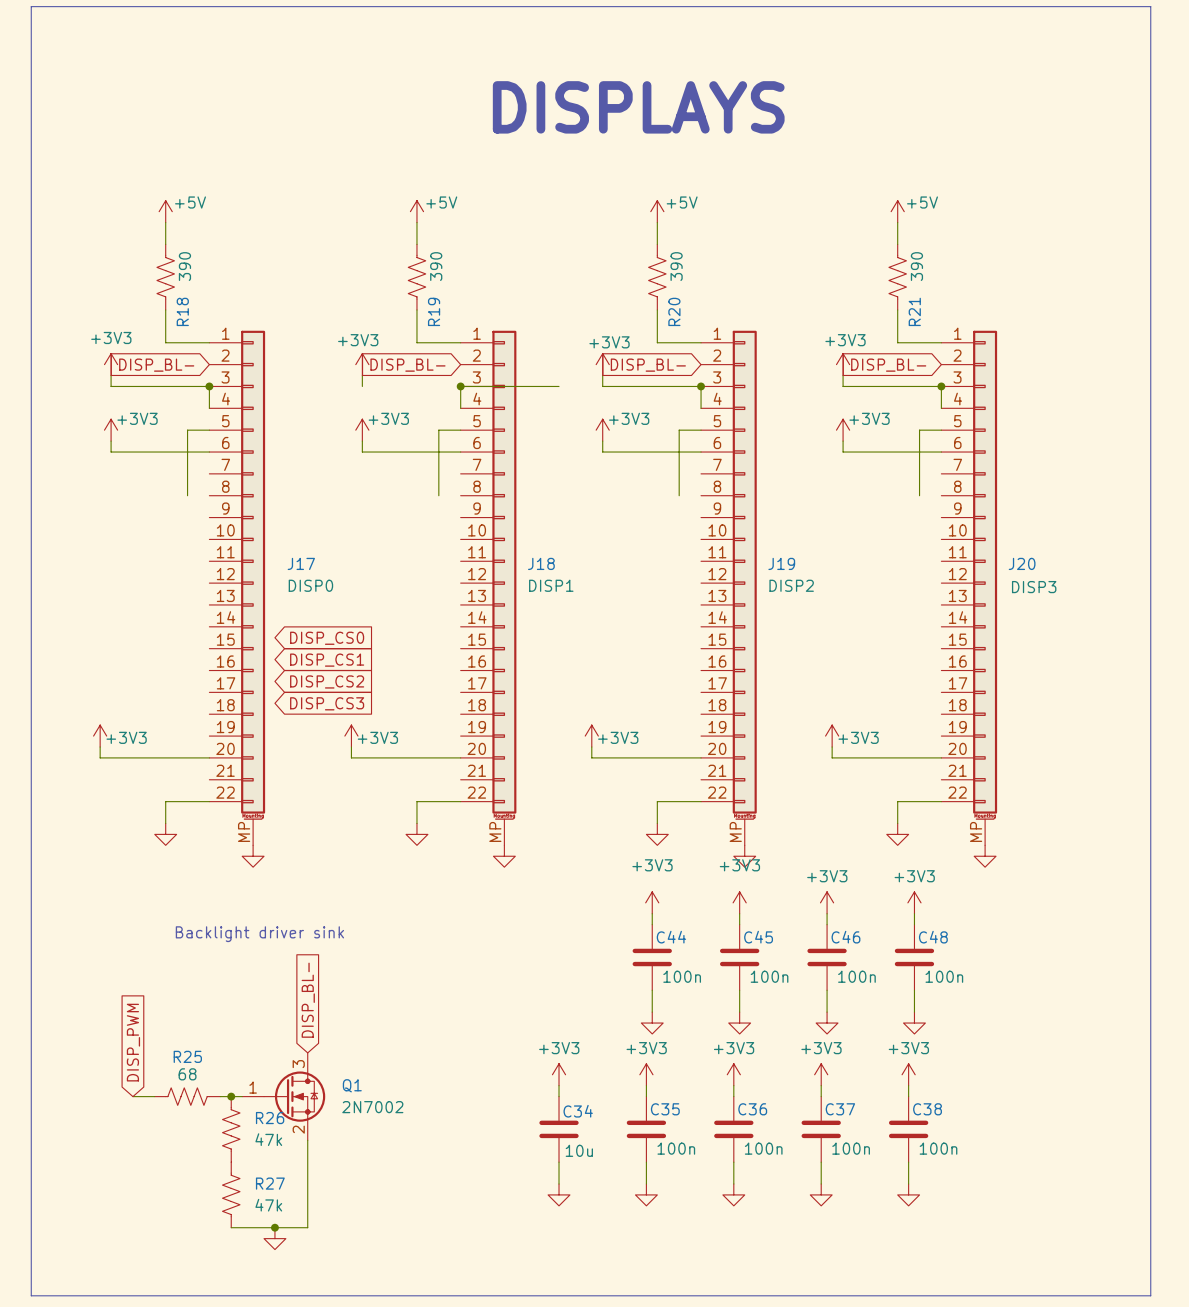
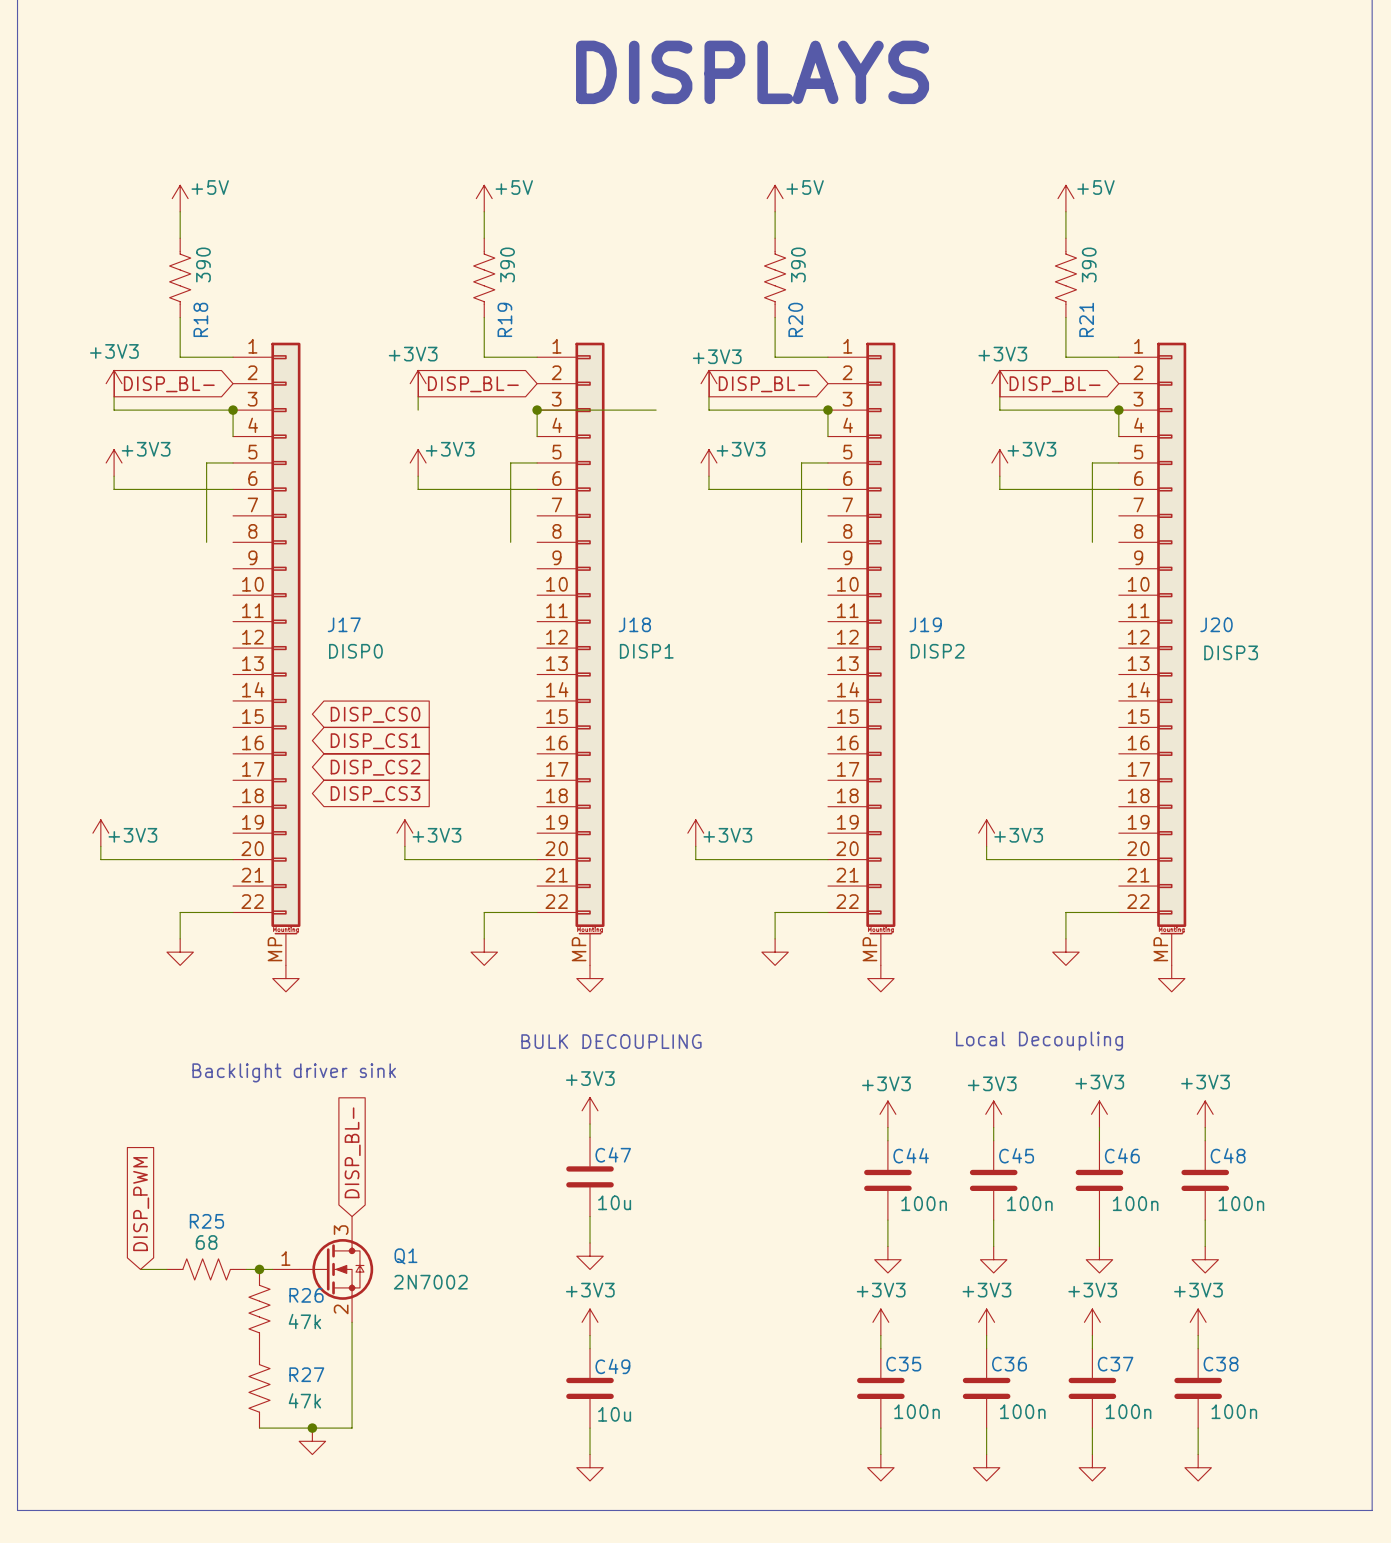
power symbol: +3V3 (652, 902) -> none
power symbol: +3V3 (739, 902) -> none
power symbol: +3V3 (827, 902) -> none
power symbol: +3V3 (914, 902) -> none
text: none -> Local Decoupling (1039, 1041)
text: none -> BULK DECOUPLING (611, 1041)
wire: (652, 913) (652, 924) -> (887, 1127) (887, 1140)
wire: (739, 913) (739, 924) -> (993, 1127) (993, 1140)
wire: (827, 913) (827, 924) -> (1099, 1127) (1099, 1140)
wire: (914, 913) (914, 924) -> (1205, 1127) (1205, 1140)
C44 position: (652, 957) -> (887, 1180)
C45 position: (739, 957) -> (993, 1180)
C46 position: (827, 957) -> (1099, 1180)
C48 position: (914, 957) -> (1205, 1180)
power symbol: none -> +3V3 (590, 1110)
power symbol: none -> +3V3 (887, 1114)
power symbol: none -> +3V3 (993, 1114)
power symbol: none -> +3V3 (1099, 1114)
power symbol: none -> +3V3 (1205, 1114)
wire: none -> (590, 1124) (590, 1137)
wire: (652, 990) (652, 1012) -> (887, 1220) (887, 1246)
wire: (739, 990) (739, 1012) -> (993, 1220) (993, 1246)
wire: (827, 990) (827, 1012) -> (1099, 1220) (1099, 1246)
wire: (914, 990) (914, 1012) -> (1205, 1220) (1205, 1246)
C47: none -> 10u (590, 1176)
power symbol: (652, 1023) -> none
power symbol: (739, 1023) -> none
power symbol: (827, 1023) -> none
power symbol: (914, 1023) -> none
wire: none -> (590, 1216) (590, 1242)
power symbol: +3V3 (559, 1074) -> none
power symbol: +3V3 (646, 1074) -> none
power symbol: +3V3 (733, 1074) -> none
power symbol: +3V3 (821, 1074) -> none
power symbol: +3V3 (908, 1074) -> none
power symbol: none -> (590, 1256)
wire: (559, 1085) (559, 1096) -> (590, 1335) (590, 1348)
wire: (646, 1085) (646, 1096) -> (880, 1335) (880, 1348)
wire: (733, 1085) (733, 1096) -> (986, 1335) (986, 1348)
wire: (821, 1085) (821, 1096) -> (1092, 1335) (1092, 1348)
wire: (908, 1085) (908, 1096) -> (1198, 1335) (1198, 1348)
power symbol: none -> (887, 1259)
power symbol: none -> (993, 1259)
power symbol: none -> (1099, 1259)
power symbol: none -> (1205, 1259)
C34: 10u (559, 1129) -> none
C35 position: (646, 1129) -> (880, 1388)
C36 position: (733, 1129) -> (986, 1388)
C37 position: (821, 1129) -> (1092, 1388)
C38 position: (908, 1129) -> (1198, 1388)
power symbol: none -> +3V3 (590, 1322)
power symbol: none -> +3V3 (880, 1322)
power symbol: none -> +3V3 (986, 1322)
power symbol: none -> +3V3 (1092, 1322)
power symbol: none -> +3V3 (1198, 1322)
wire: (559, 1162) (559, 1184) -> (590, 1428) (590, 1454)
wire: (646, 1162) (646, 1184) -> (880, 1428) (880, 1454)
wire: (733, 1162) (733, 1184) -> (986, 1428) (986, 1454)
wire: (821, 1162) (821, 1184) -> (1092, 1428) (1092, 1454)
wire: (908, 1162) (908, 1184) -> (1198, 1428) (1198, 1454)
C49: none -> 10u (590, 1388)
power symbol: (559, 1194) -> none
power symbol: (646, 1194) -> none
power symbol: (733, 1194) -> none
power symbol: (821, 1194) -> none
power symbol: (908, 1194) -> none
power symbol: none -> (590, 1467)
power symbol: none -> (880, 1467)
power symbol: none -> (986, 1467)
power symbol: none -> (1092, 1467)
power symbol: none -> (1198, 1467)

